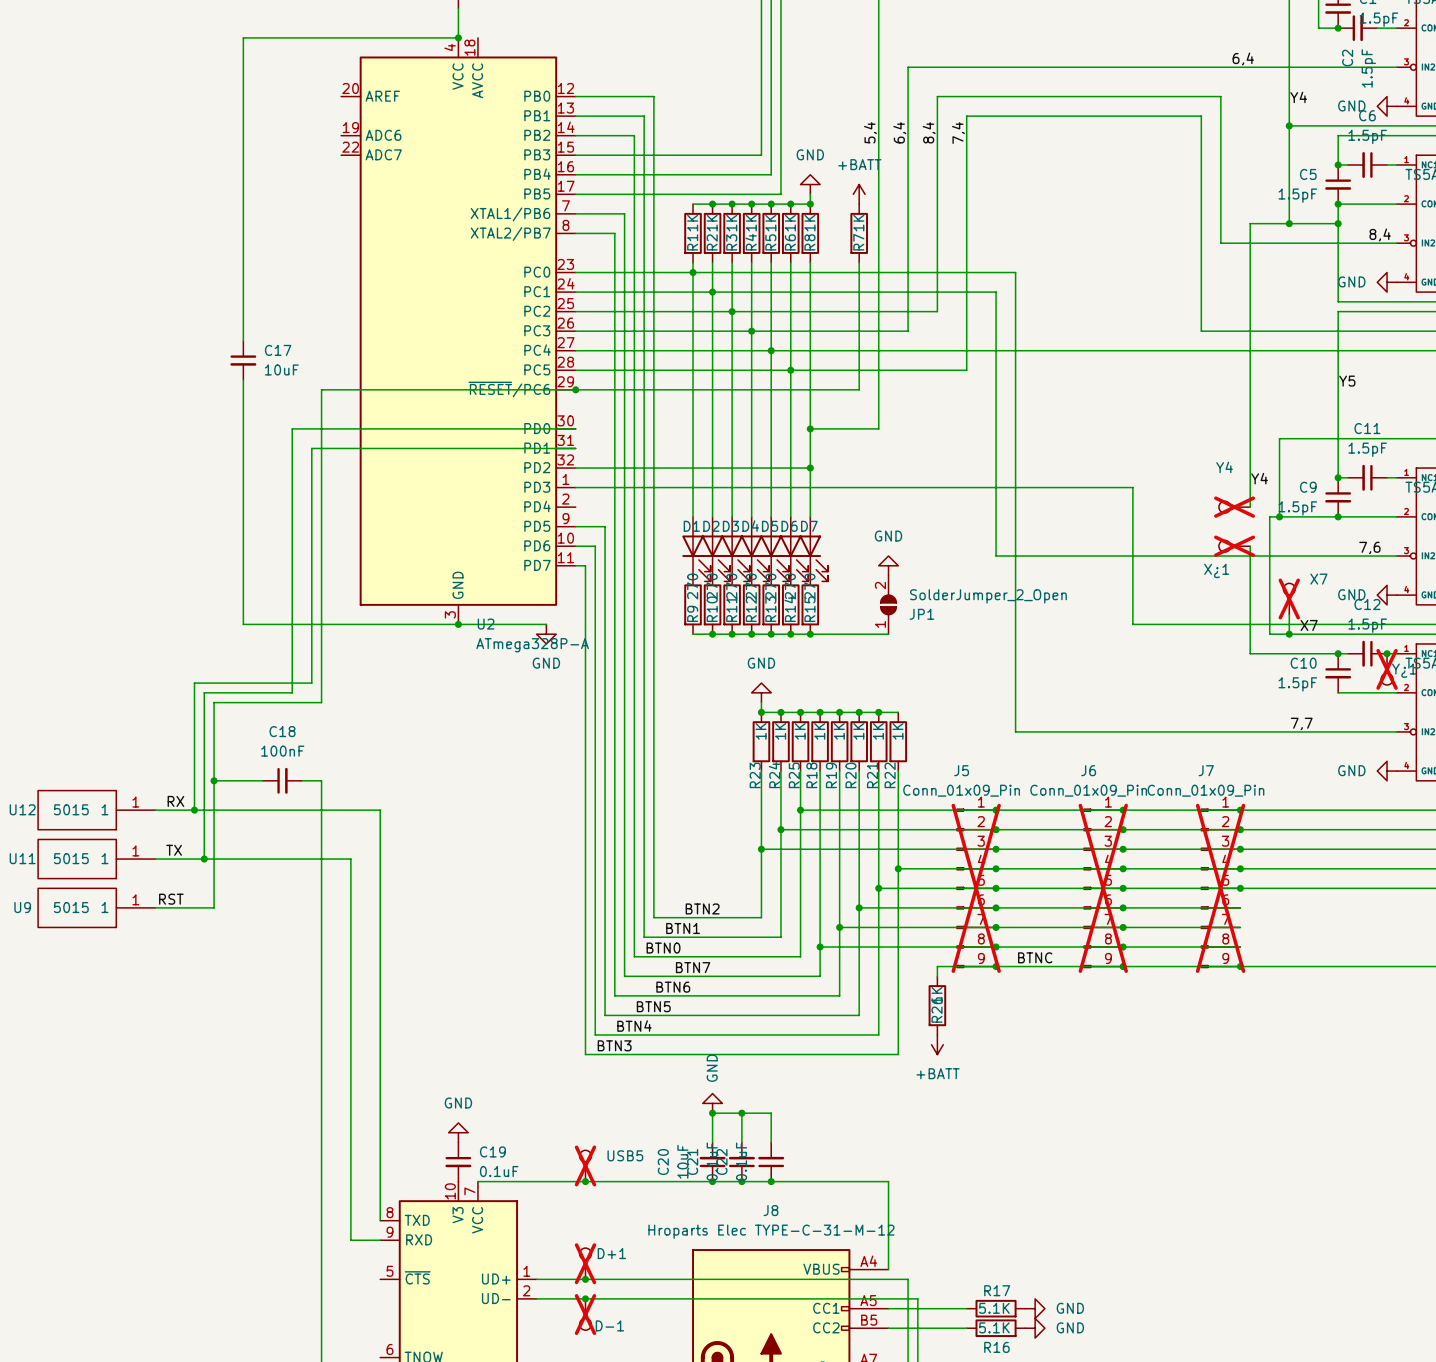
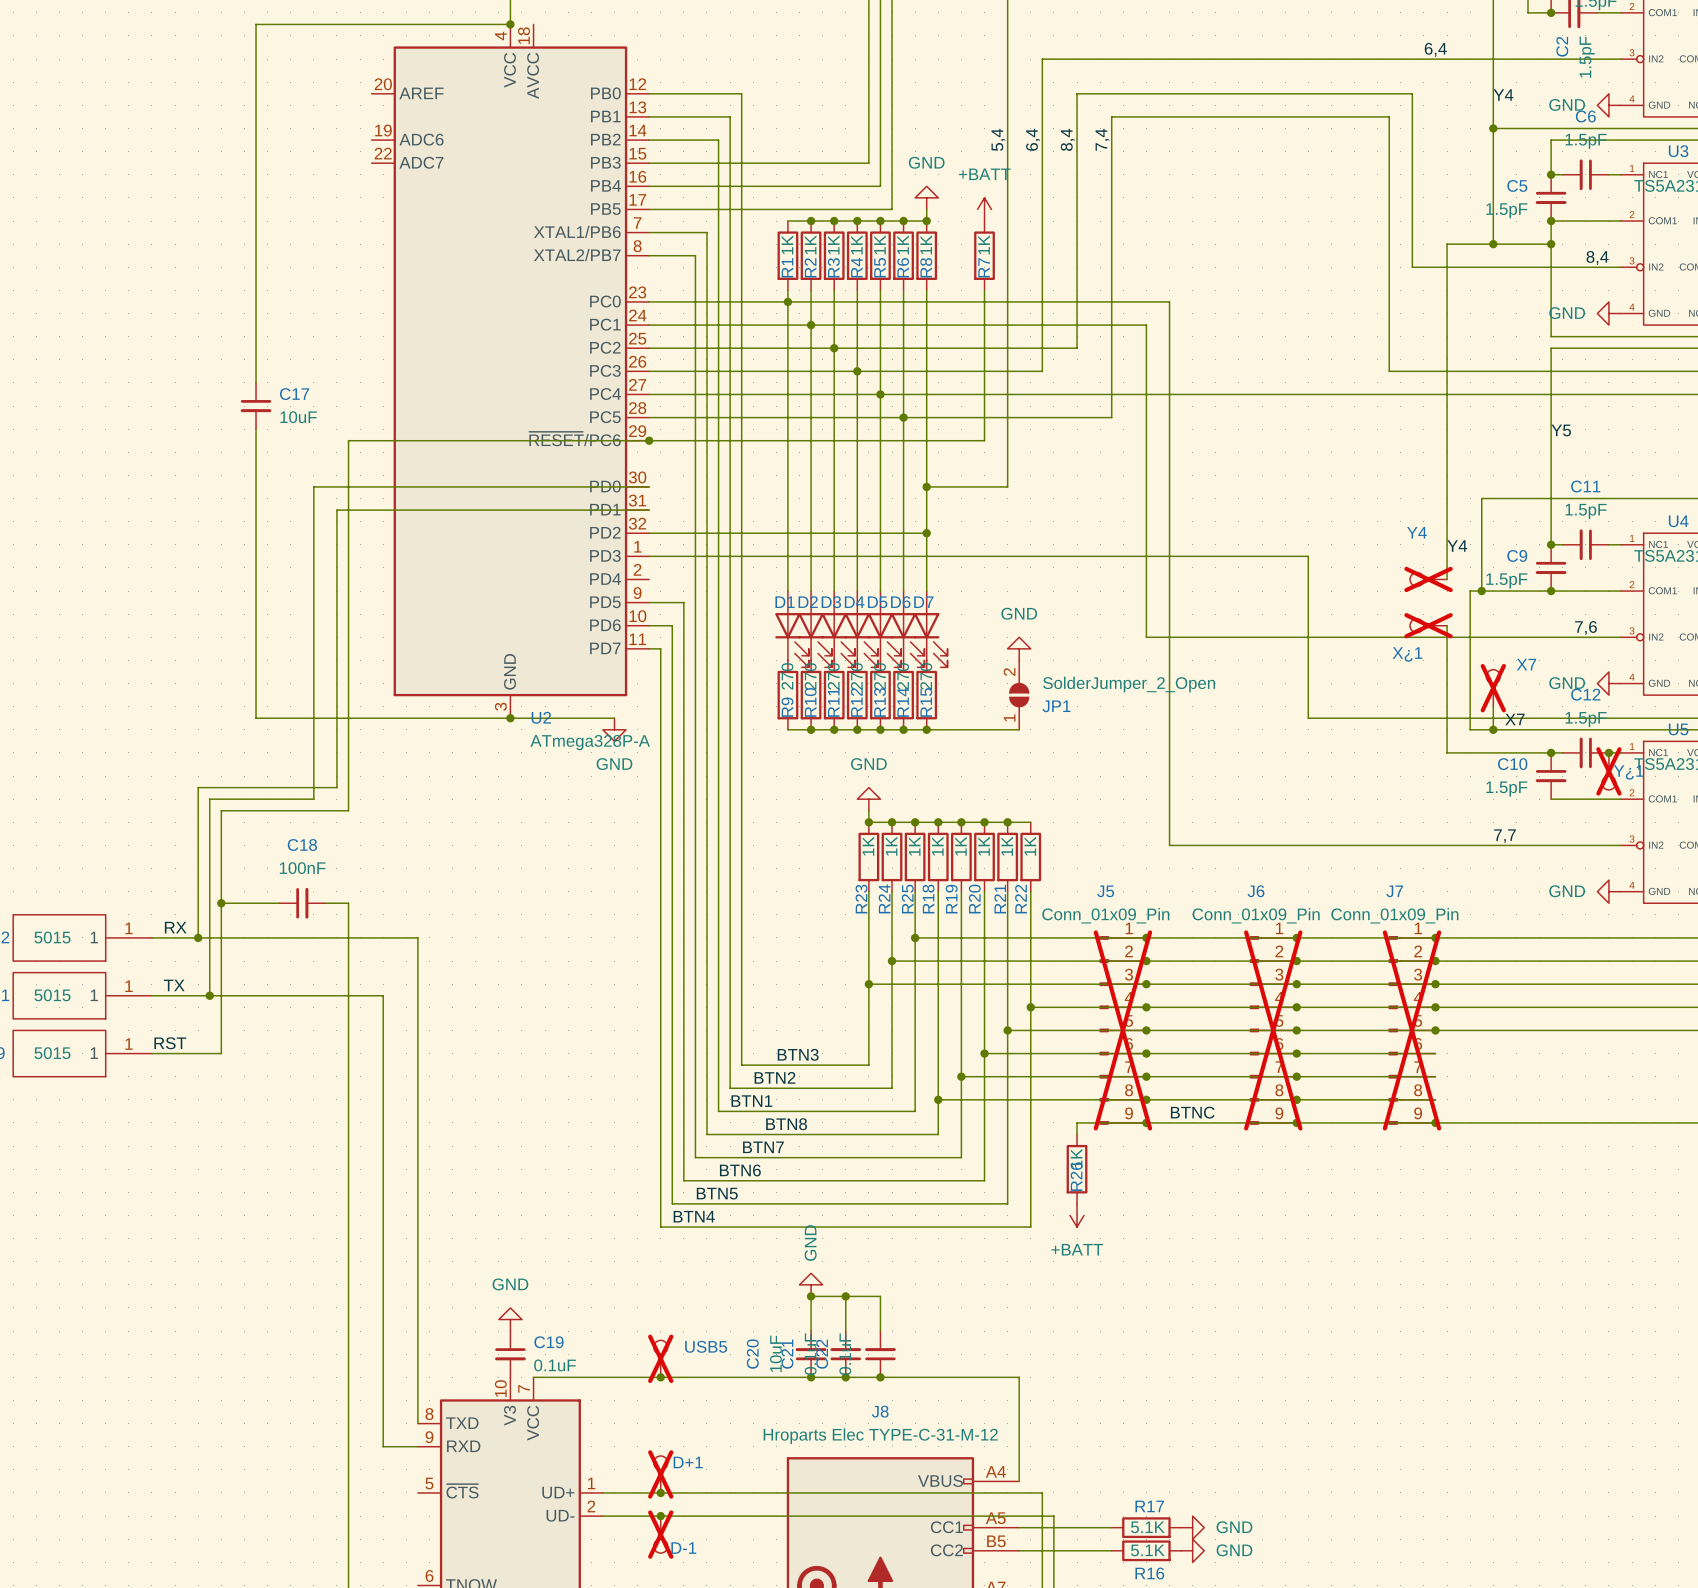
label: BTN2 (702, 908) -> BTN3 (798, 1054)
label: BTN1 (683, 928) -> BTN2 (774, 1077)
label: BTN0 (663, 948) -> BTN1 (751, 1101)
label: BTN7 (693, 967) -> BTN8 (786, 1124)
label: BTN6 (673, 987) -> BTN7 (763, 1147)
label: BTN5 (653, 1006) -> BTN6 (740, 1170)
label: BTN4 (634, 1026) -> BTN5 (717, 1193)
label: BTN3 (614, 1045) -> BTN4 (694, 1216)

